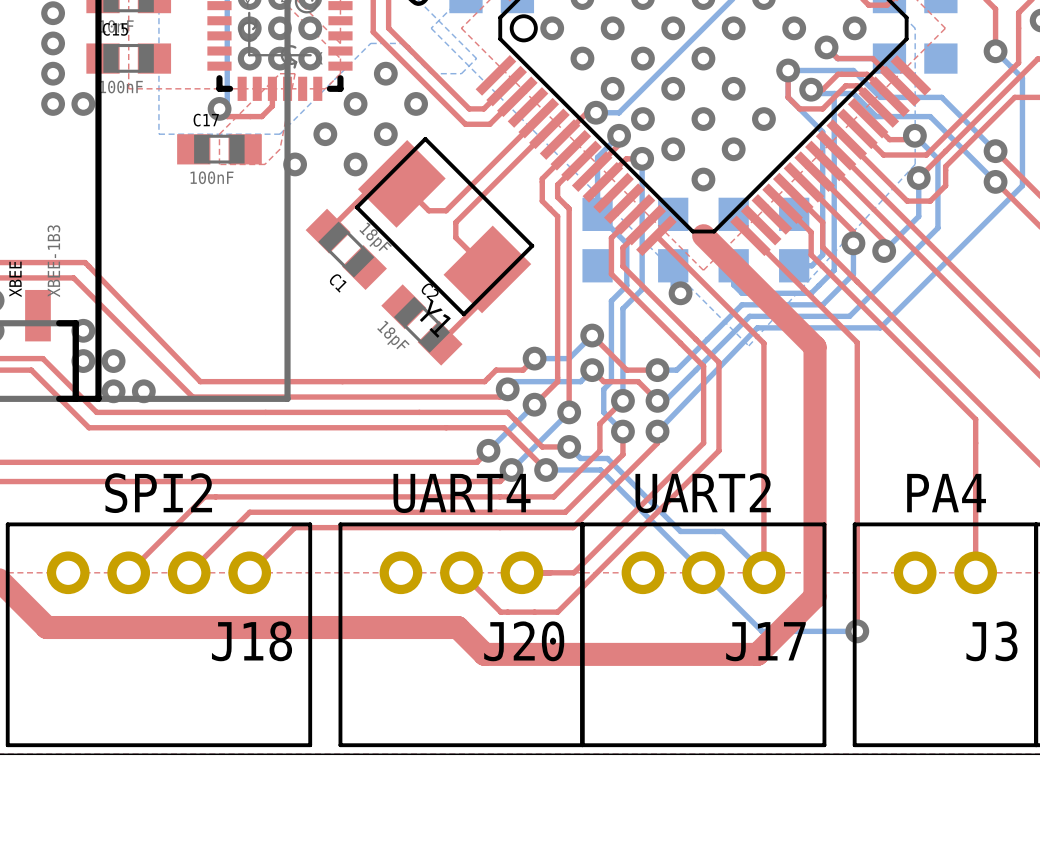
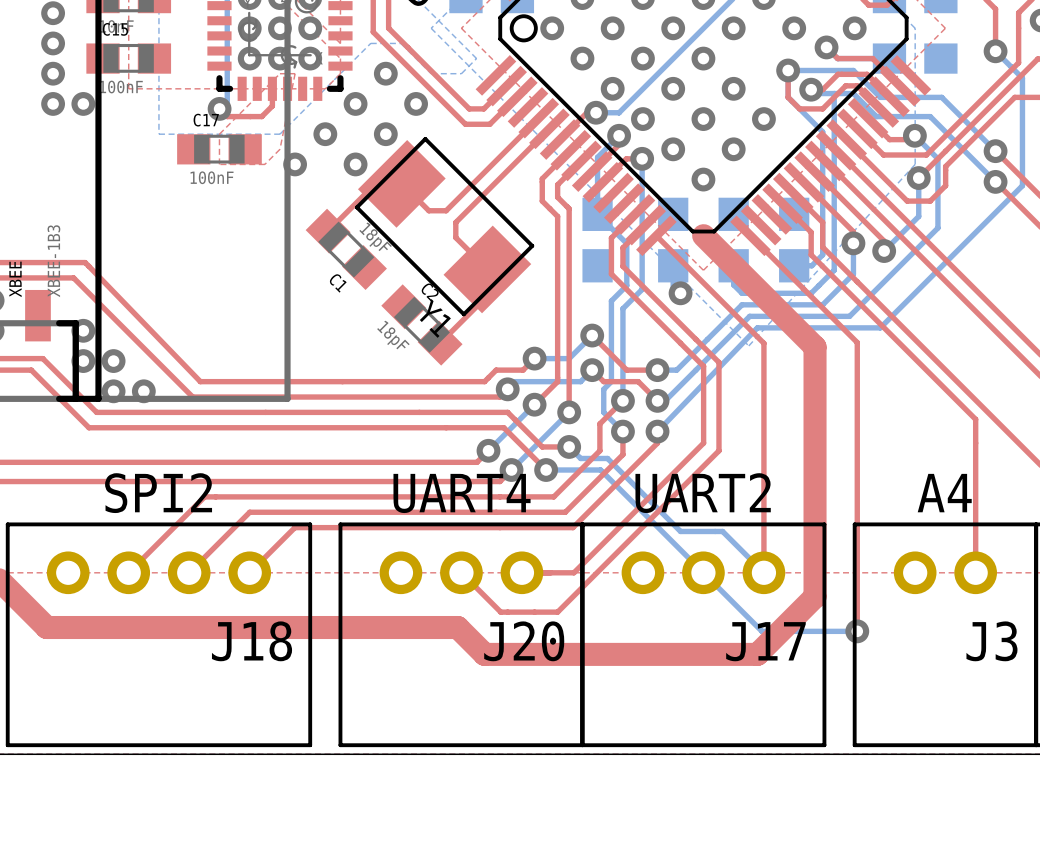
text: PA4 (946, 493) -> A4 (944, 493)

